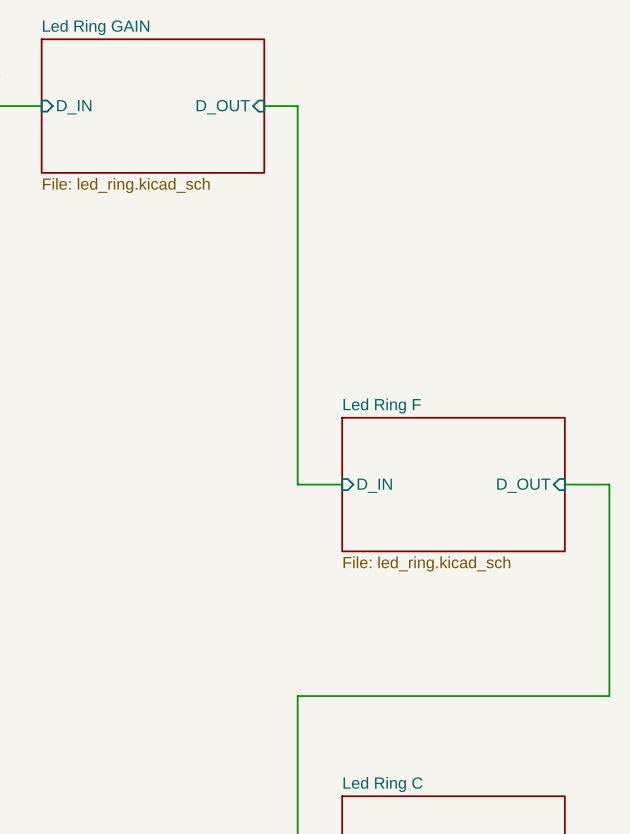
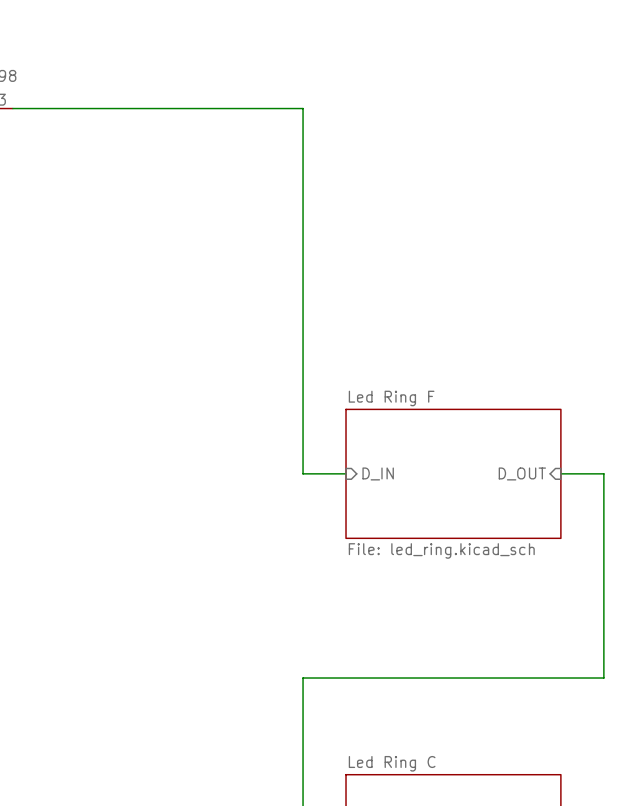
wire: none -> (55, 108) (270, 108)
sheet Led Ring GAIN: File: led_ring.kicad_sch (152, 106) -> none
sheet pin: D_IN (74, 107) -> none
sheet pin: D_OUT (223, 107) -> none

